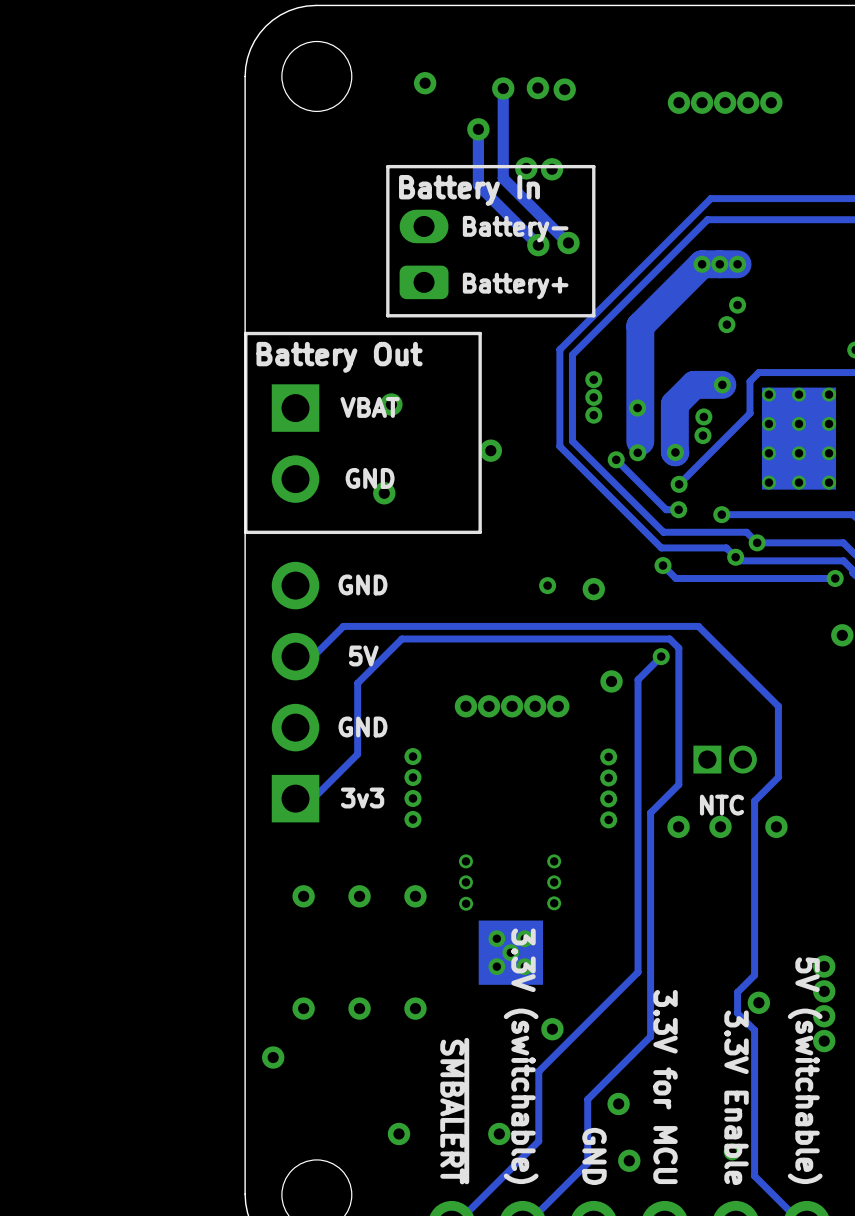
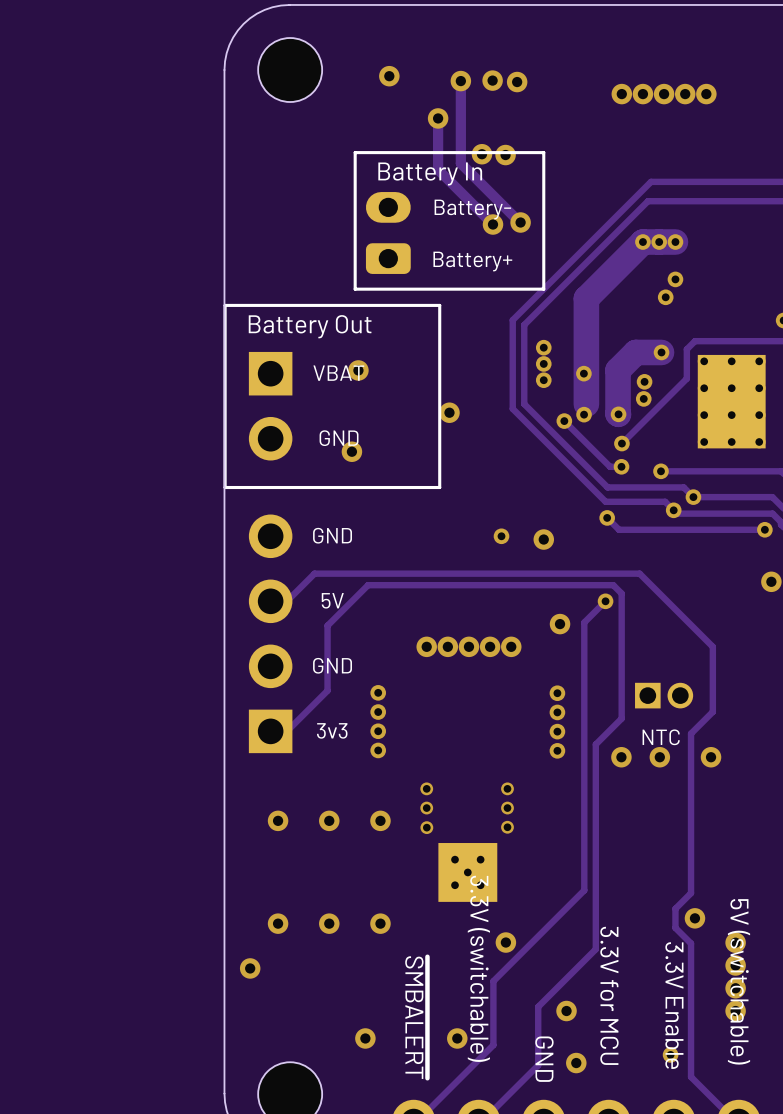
via: (824, 966) -> none
via: (824, 991) -> none
via: (824, 1016) -> none
via: none -> (735, 942)
via: (824, 1041) -> none
via: none -> (735, 965)
via: none -> (735, 988)
via: none -> (735, 1011)

